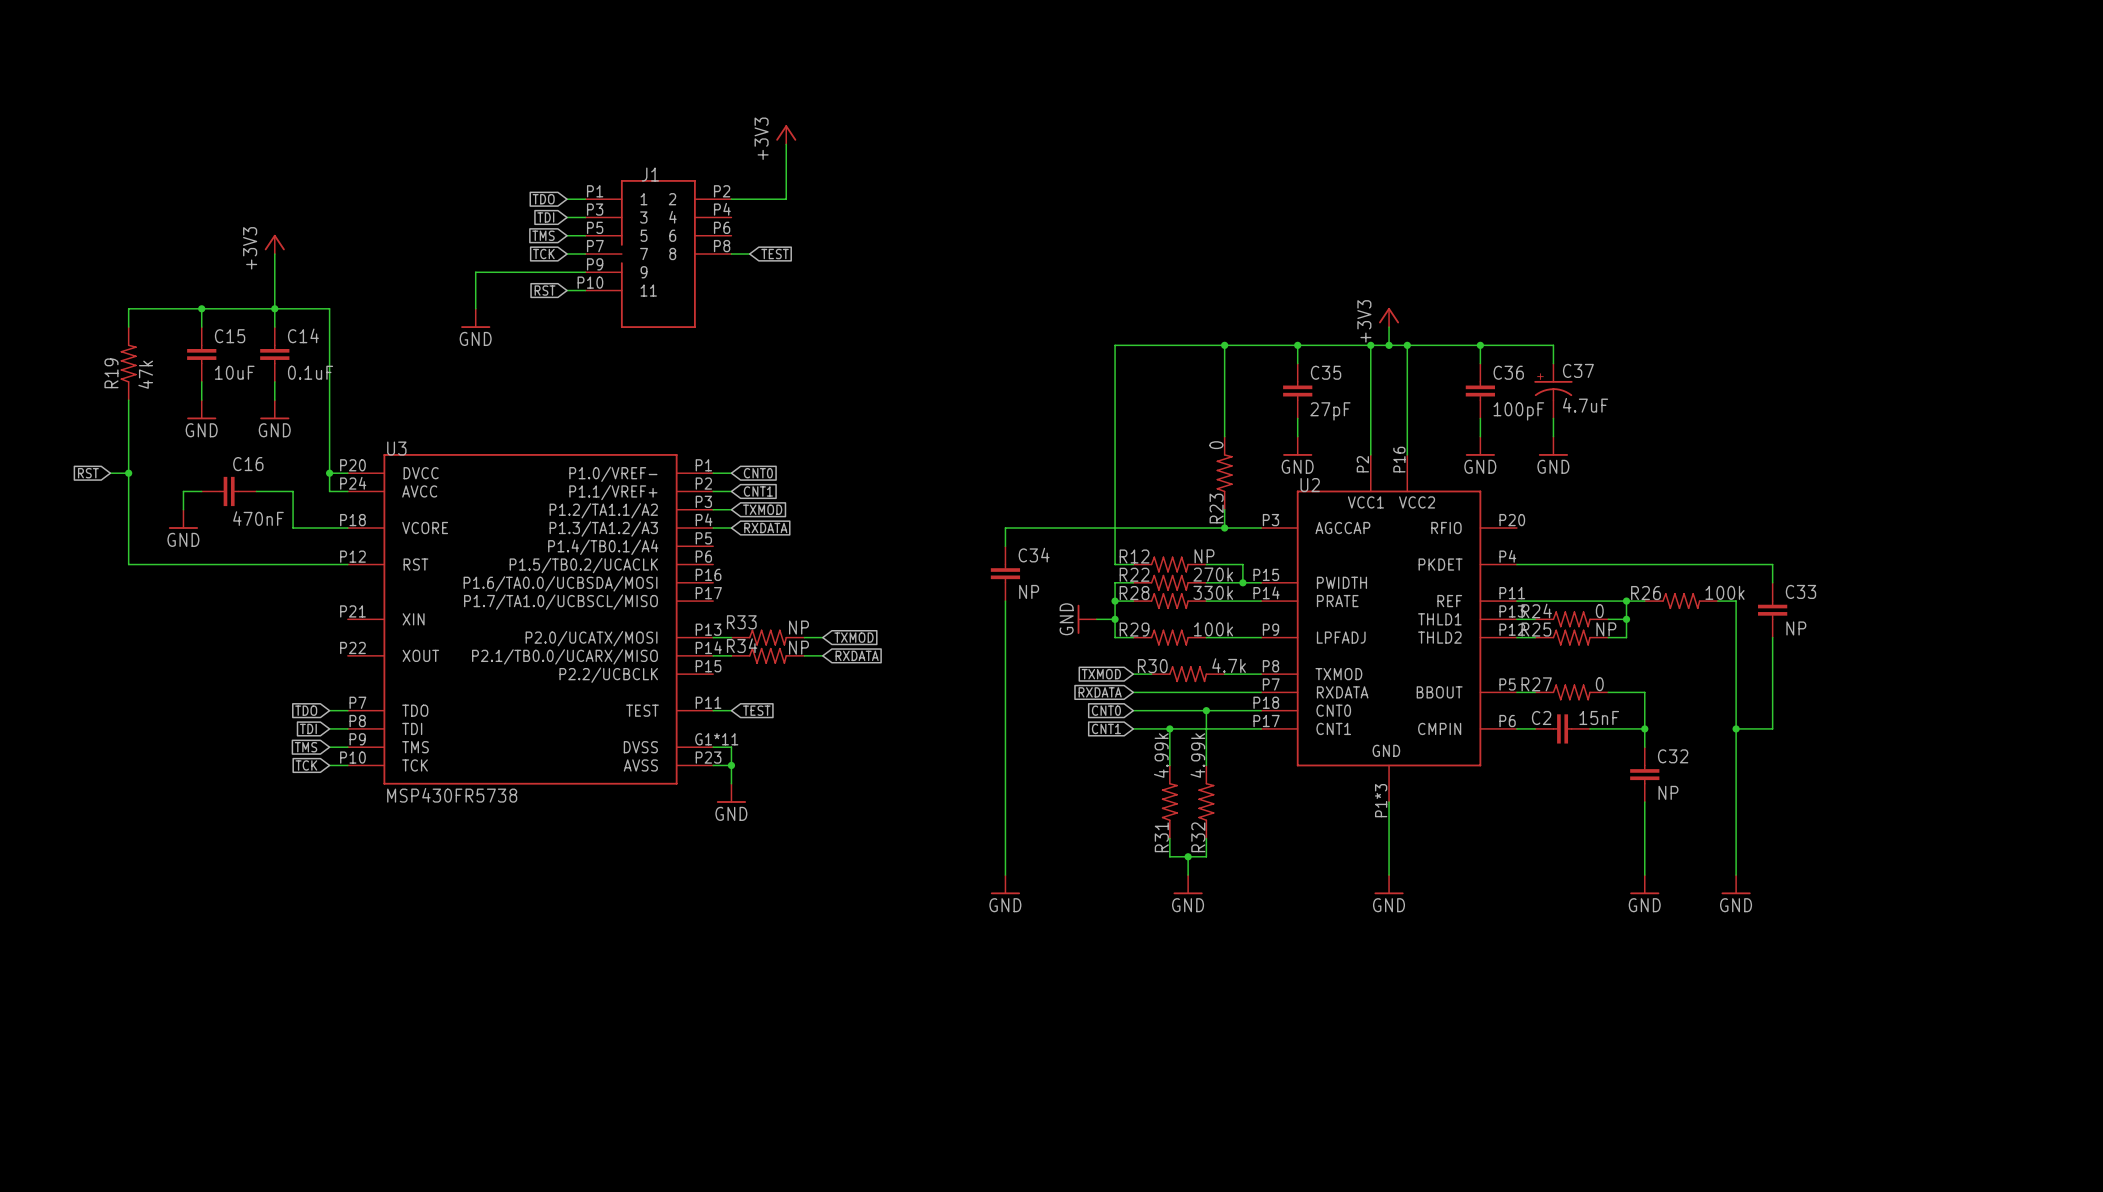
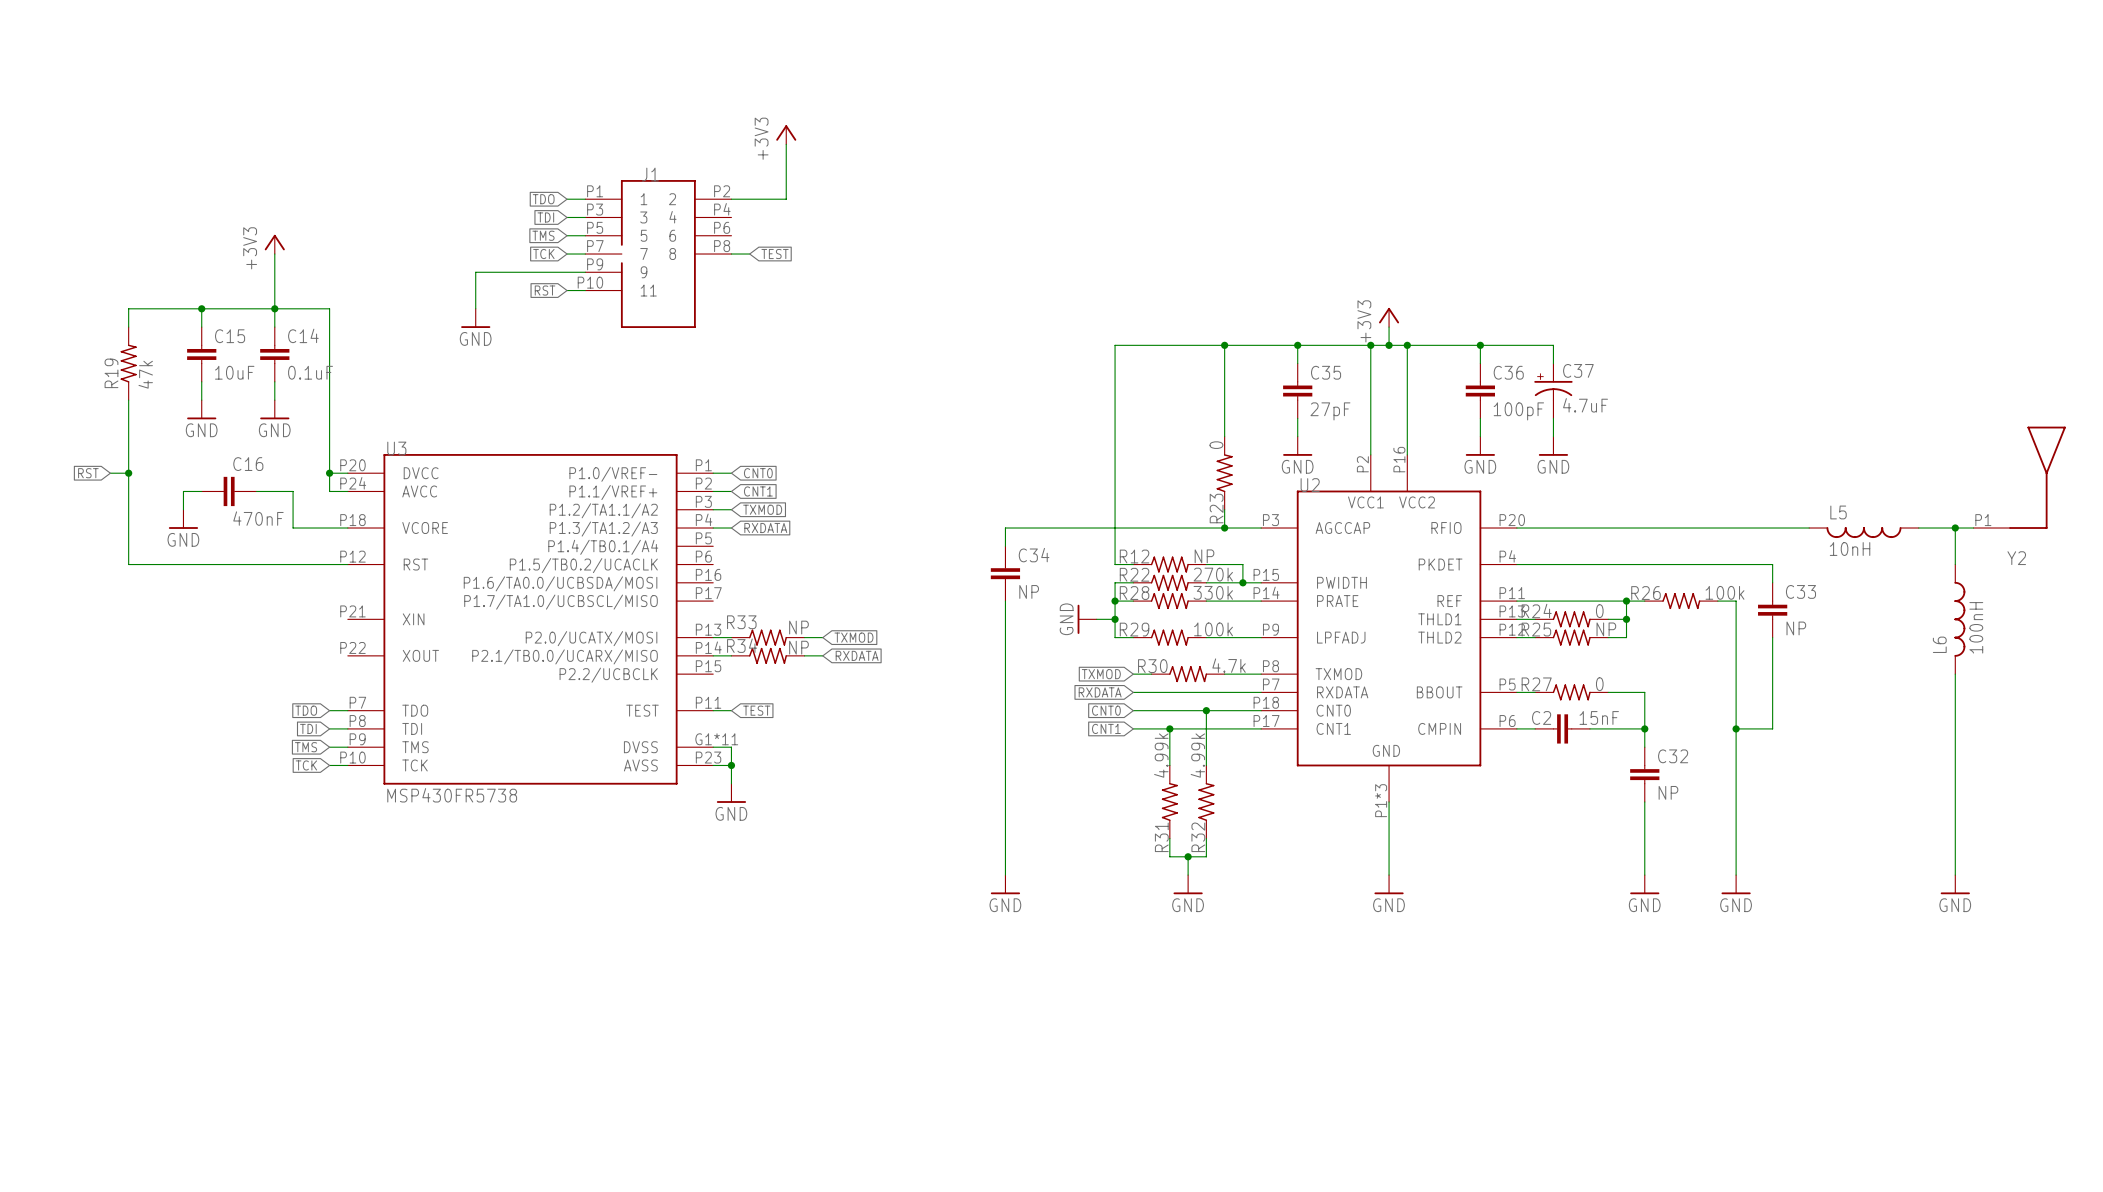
Y2: none -> (2019, 477)
wire: none -> (1516, 528) (1809, 528)
wire: none -> (1918, 528) (1973, 528)
wire: none -> (1955, 528) (1955, 564)
junction: none -> (1955, 528)
L5: none -> 10nH (1863, 532)
L6: none -> 100nH (1959, 619)
wire: none -> (1955, 674) (1955, 875)
power symbol: none -> GND (1955, 884)

